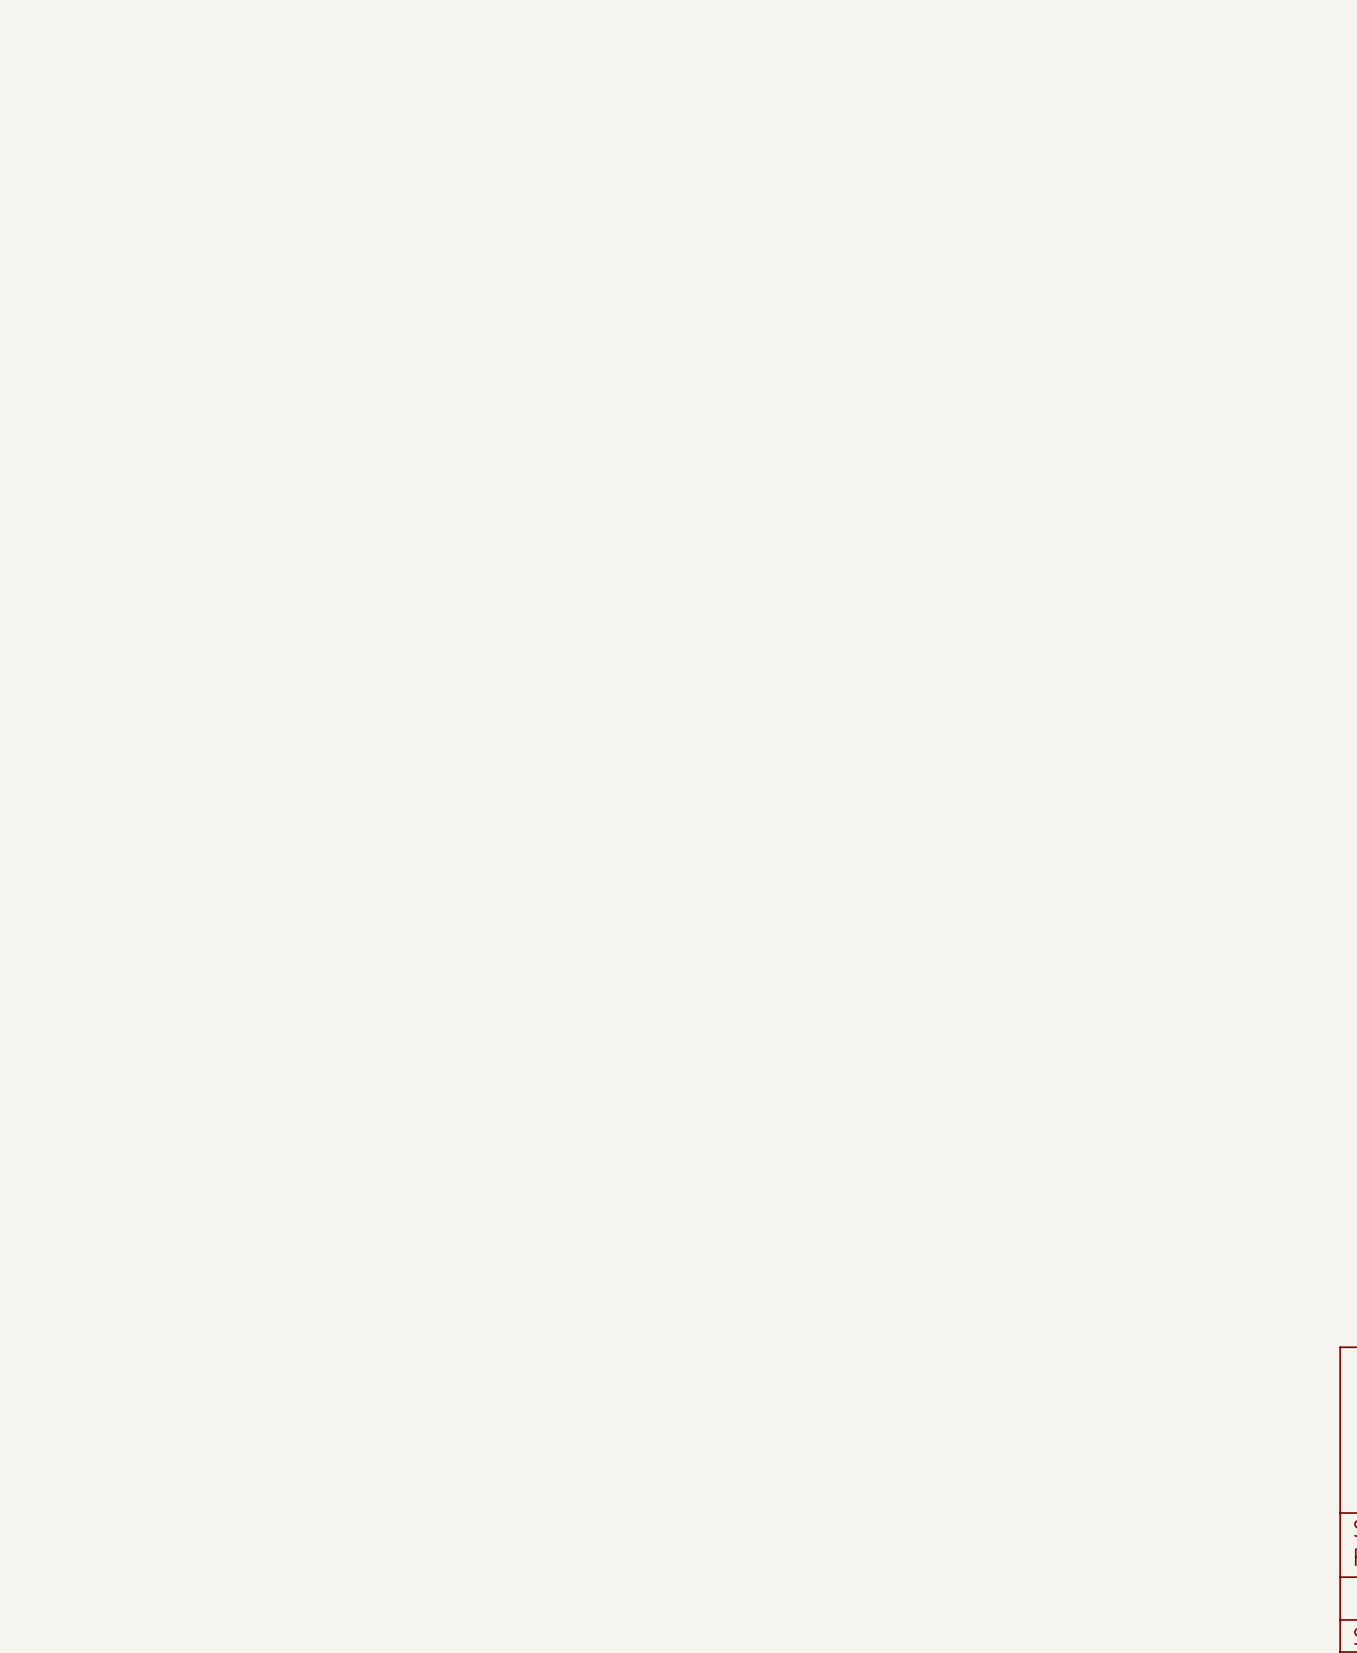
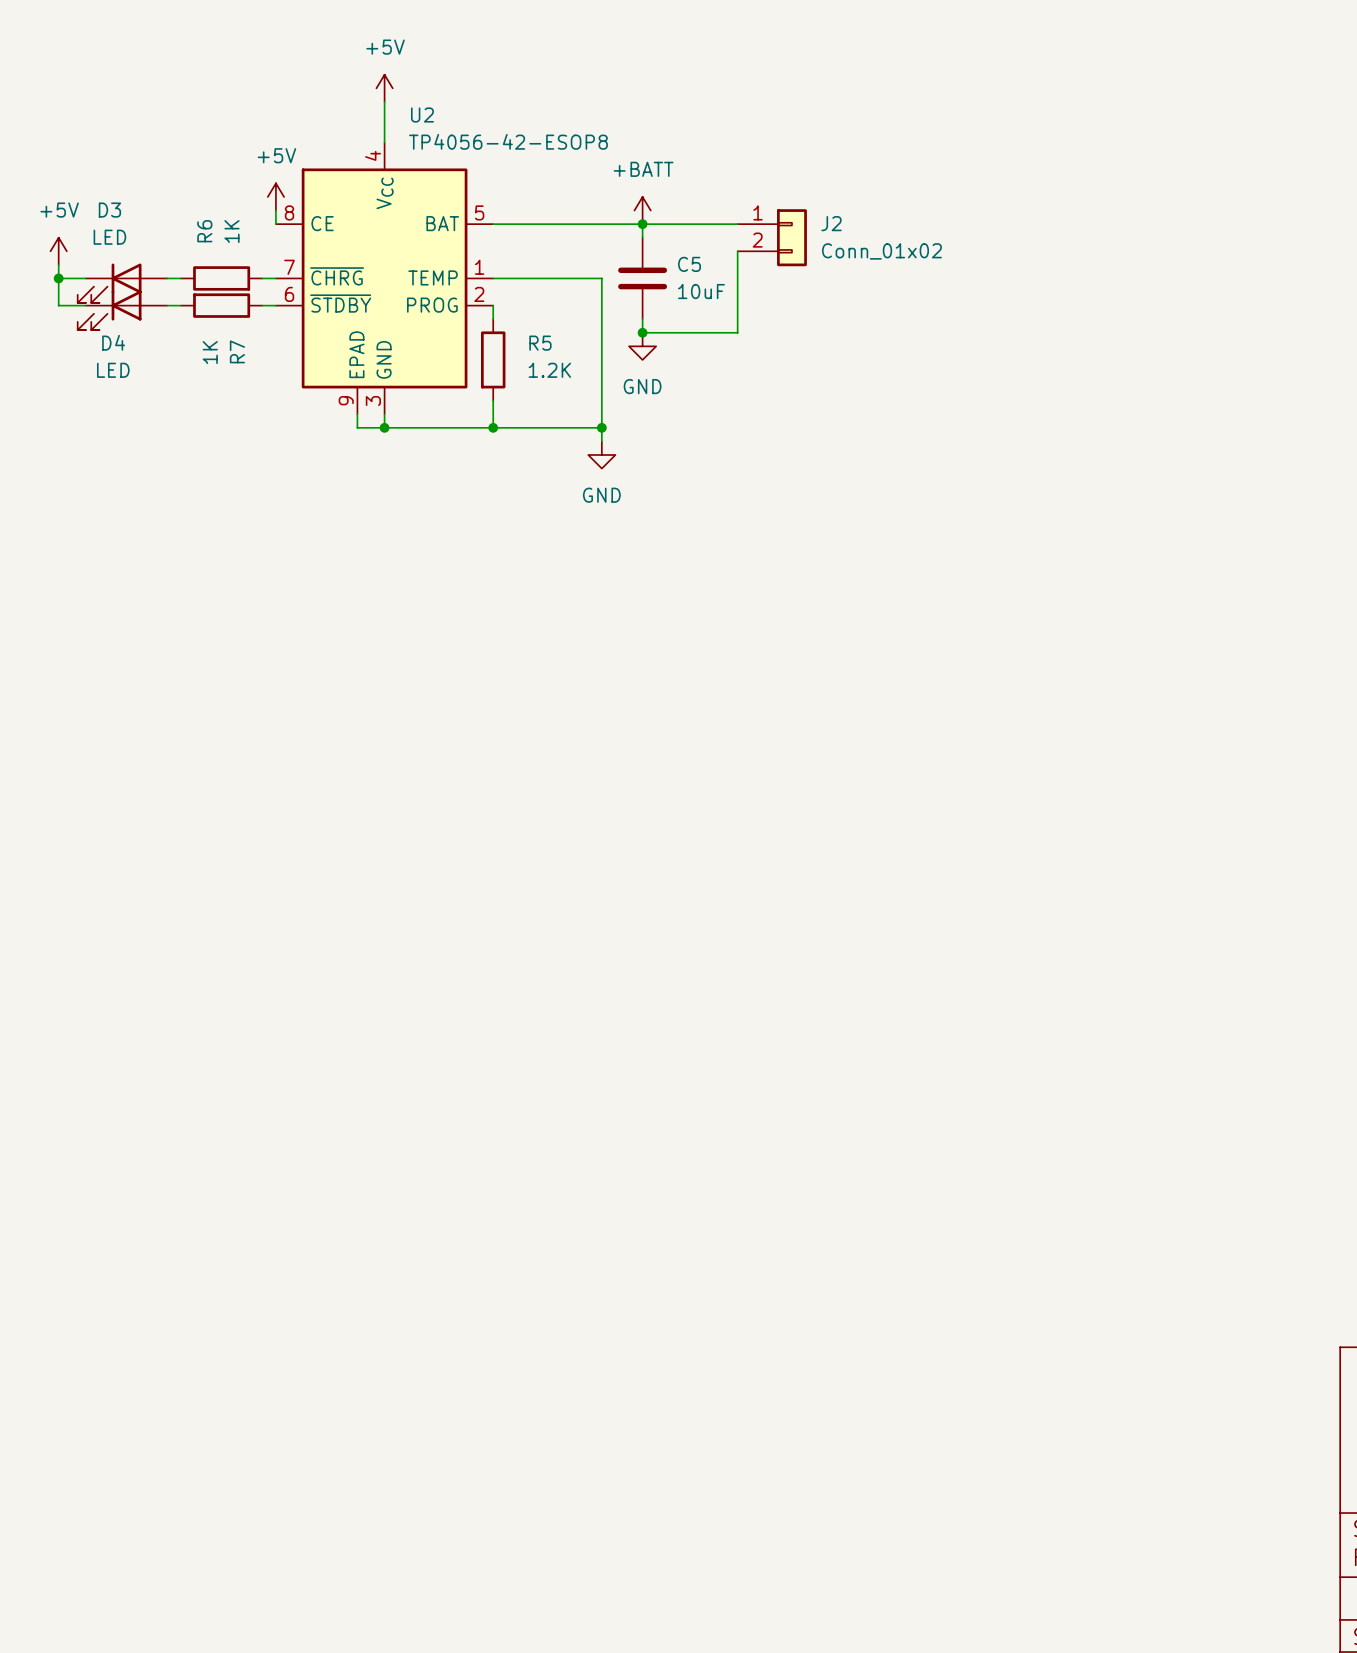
power symbol: none -> +5V (384, 88)
wire: none -> (384, 101) (384, 142)
power symbol: none -> +5V (275, 196)
wire: none -> (275, 210) (275, 224)
power symbol: none -> +BATT (642, 210)
wire: none -> (493, 224) (737, 224)
wire: none -> (642, 224) (642, 237)
junction: none -> (642, 224)
J2: none -> Conn_01x02 (772, 237)
power symbol: none -> +5V (58, 251)
wire: none -> (737, 251) (737, 332) (642, 332) (642, 319)
wire: none -> (58, 264) (58, 305) (85, 305)
wire: none -> (58, 278) (85, 278)
junction: none -> (58, 278)
wire: none -> (167, 278) (180, 278)
R6: none -> 1K (221, 278)
wire: none -> (262, 278) (275, 278)
U2: none -> TP4056-42-ESOP8 (384, 278)
wire: none -> (493, 278) (601, 278) (601, 441)
C5: none -> 10uF (642, 278)
D3: none -> LED (122, 283)
wire: none -> (167, 305) (180, 305)
R7: none -> 1K (221, 305)
wire: none -> (262, 305) (275, 305)
wire: none -> (493, 305) (493, 319)
D4: none -> LED (122, 310)
junction: none -> (642, 332)
power symbol: none -> GND (642, 346)
R5: none -> 1.2K (493, 359)
wire: none -> (493, 400) (493, 427)
wire: none -> (357, 414) (357, 427) (601, 427)
wire: none -> (384, 414) (384, 427)
junction: none -> (384, 427)
junction: none -> (493, 427)
junction: none -> (601, 427)
power symbol: none -> GND (601, 454)

